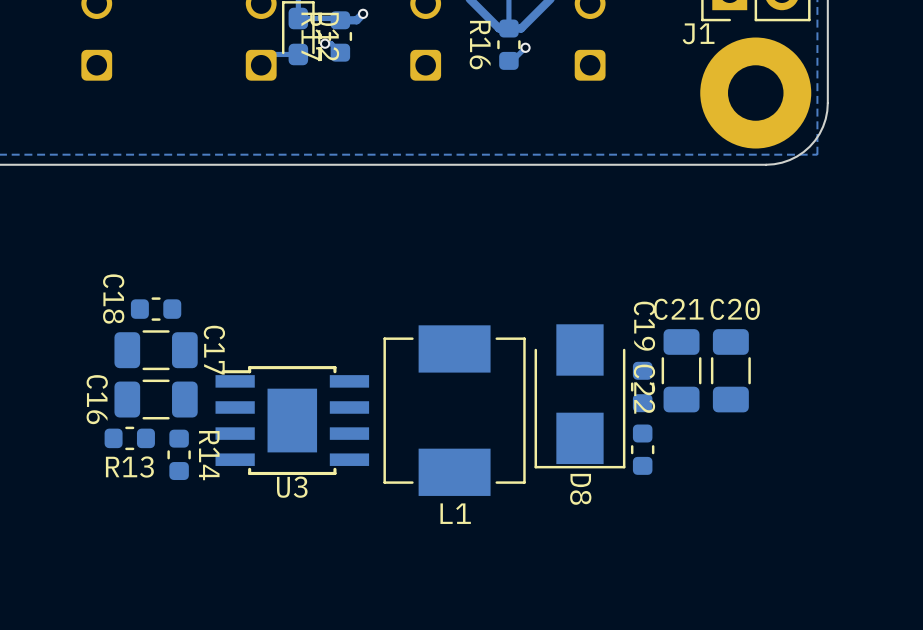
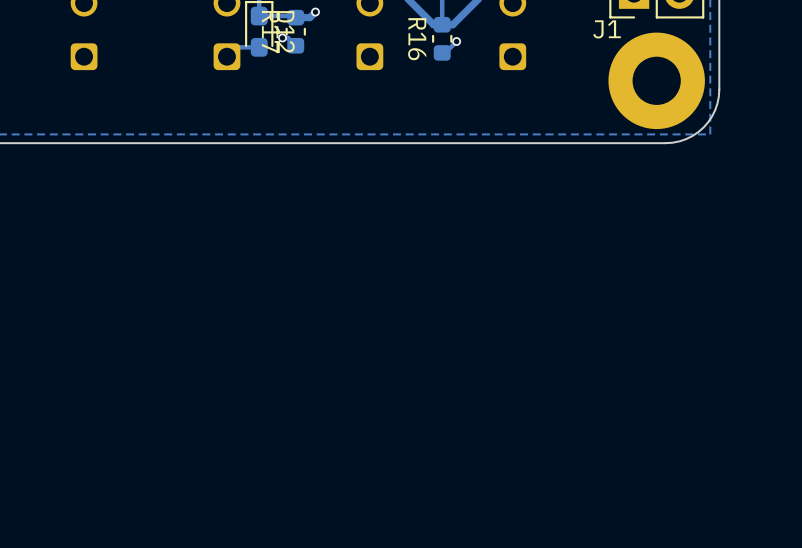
C18: (156, 309) -> none
C17: (156, 350) -> none
C21: (681, 370) -> none
C20: (730, 370) -> none
C19: (642, 386) -> none
D8: (579, 396) -> none
C16: (156, 399) -> none
L1: (454, 410) -> none
U3: (292, 420) -> none
R13: (129, 438) -> none
C22: (642, 449) -> none
R14: (179, 454) -> none

